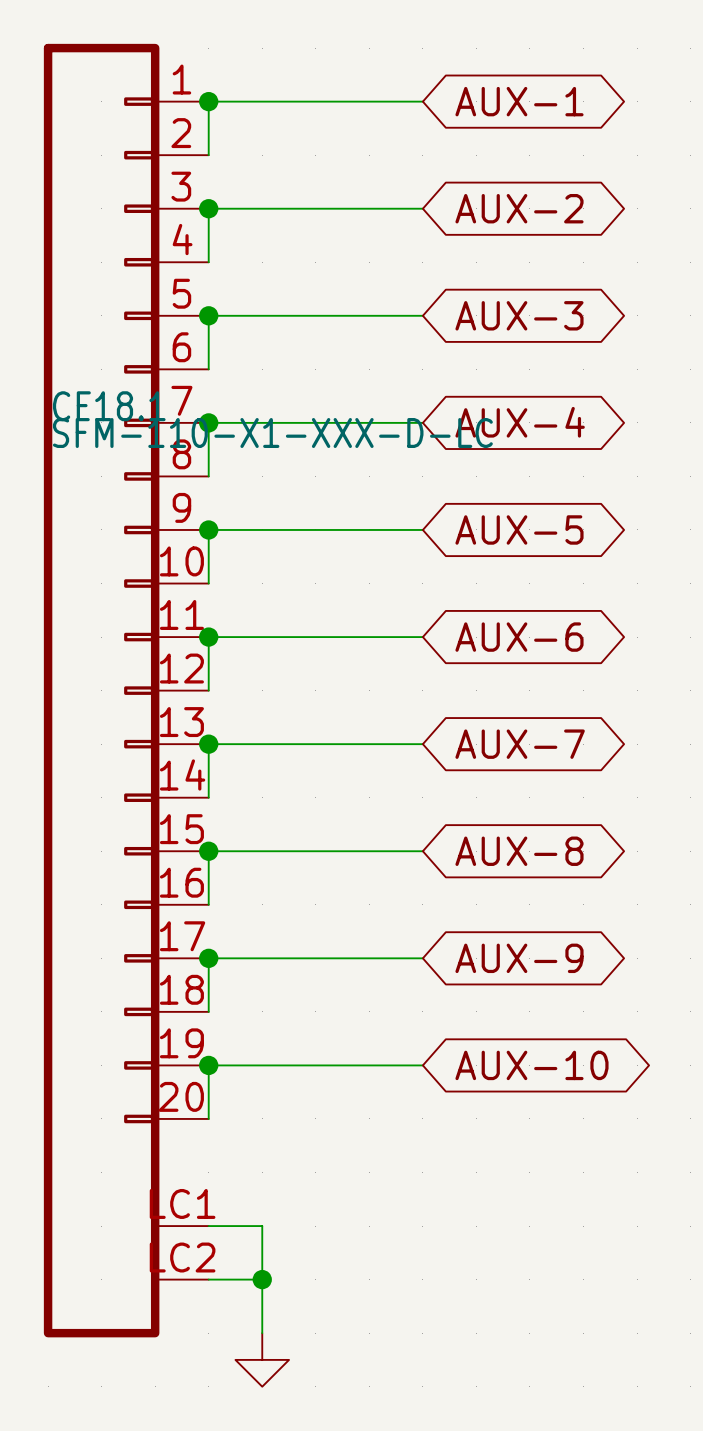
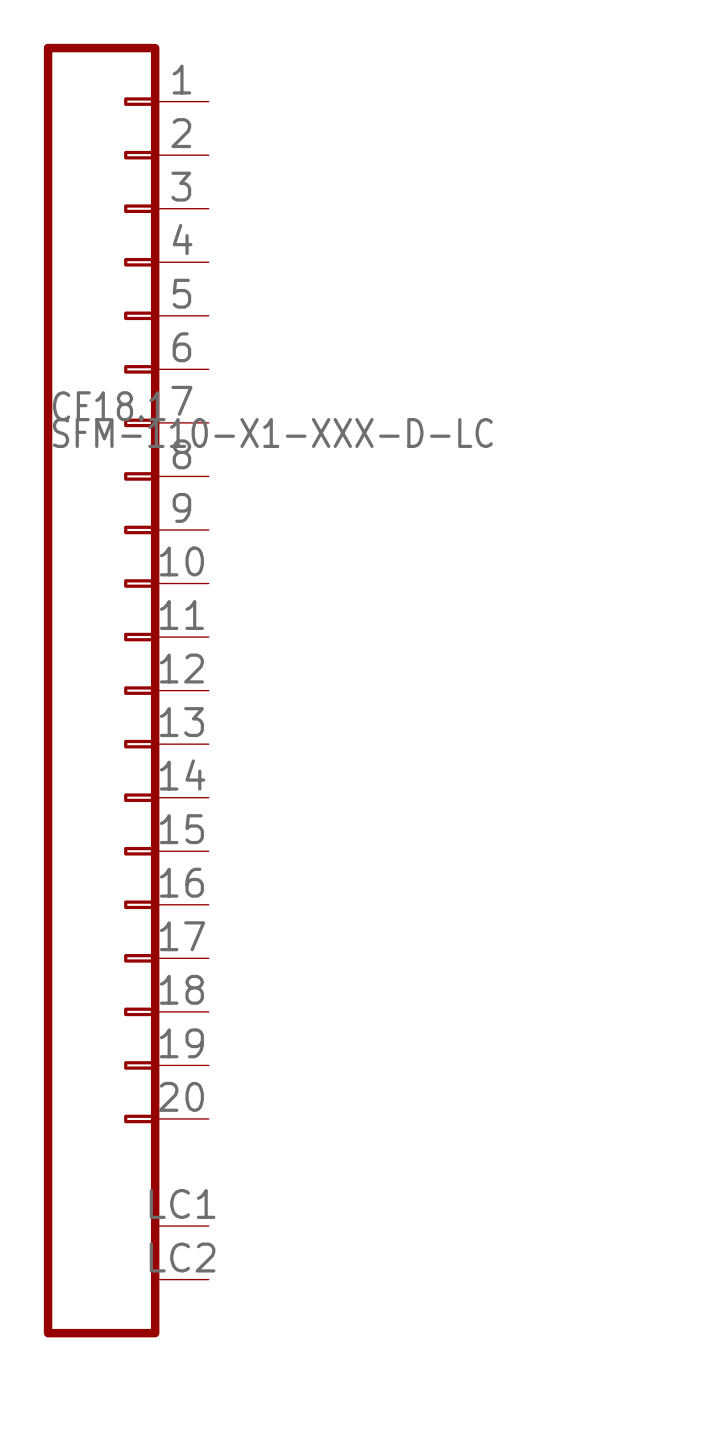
junction: (208, 101) -> none
wire: (422, 101) (208, 101) (208, 155) -> none
global label: AUX-1 (519, 101) -> none
junction: (208, 208) -> none
wire: (422, 208) (208, 208) (208, 262) -> none
global label: AUX-2 (519, 208) -> none
junction: (208, 315) -> none
wire: (422, 315) (208, 315) (208, 369) -> none
global label: AUX-3 (519, 315) -> none
junction: (208, 422) -> none
wire: (422, 422) (208, 422) (208, 476) -> none
global label: AUX-4 (520, 422) -> none
junction: (208, 529) -> none
wire: (422, 529) (208, 529) (208, 583) -> none
global label: AUX-5 (519, 529) -> none
junction: (208, 637) -> none
wire: (422, 637) (208, 637) (208, 690) -> none
global label: AUX-6 (519, 637) -> none
junction: (208, 744) -> none
wire: (422, 744) (208, 744) (208, 797) -> none
global label: AUX-7 (520, 744) -> none
junction: (208, 851) -> none
wire: (422, 851) (208, 851) (208, 904) -> none
global label: AUX-8 (519, 851) -> none
junction: (208, 958) -> none
wire: (422, 958) (208, 958) (208, 1011) -> none
global label: AUX-9 (519, 958) -> none
junction: (208, 1065) -> none
wire: (422, 1065) (208, 1065) (208, 1118) -> none
global label: AUX-10 (531, 1065) -> none
wire: (208, 1226) (262, 1226) (262, 1333) -> none
wire: (208, 1279) (262, 1279) -> none
junction: (262, 1279) -> none
power symbol: (262, 1359) -> none

